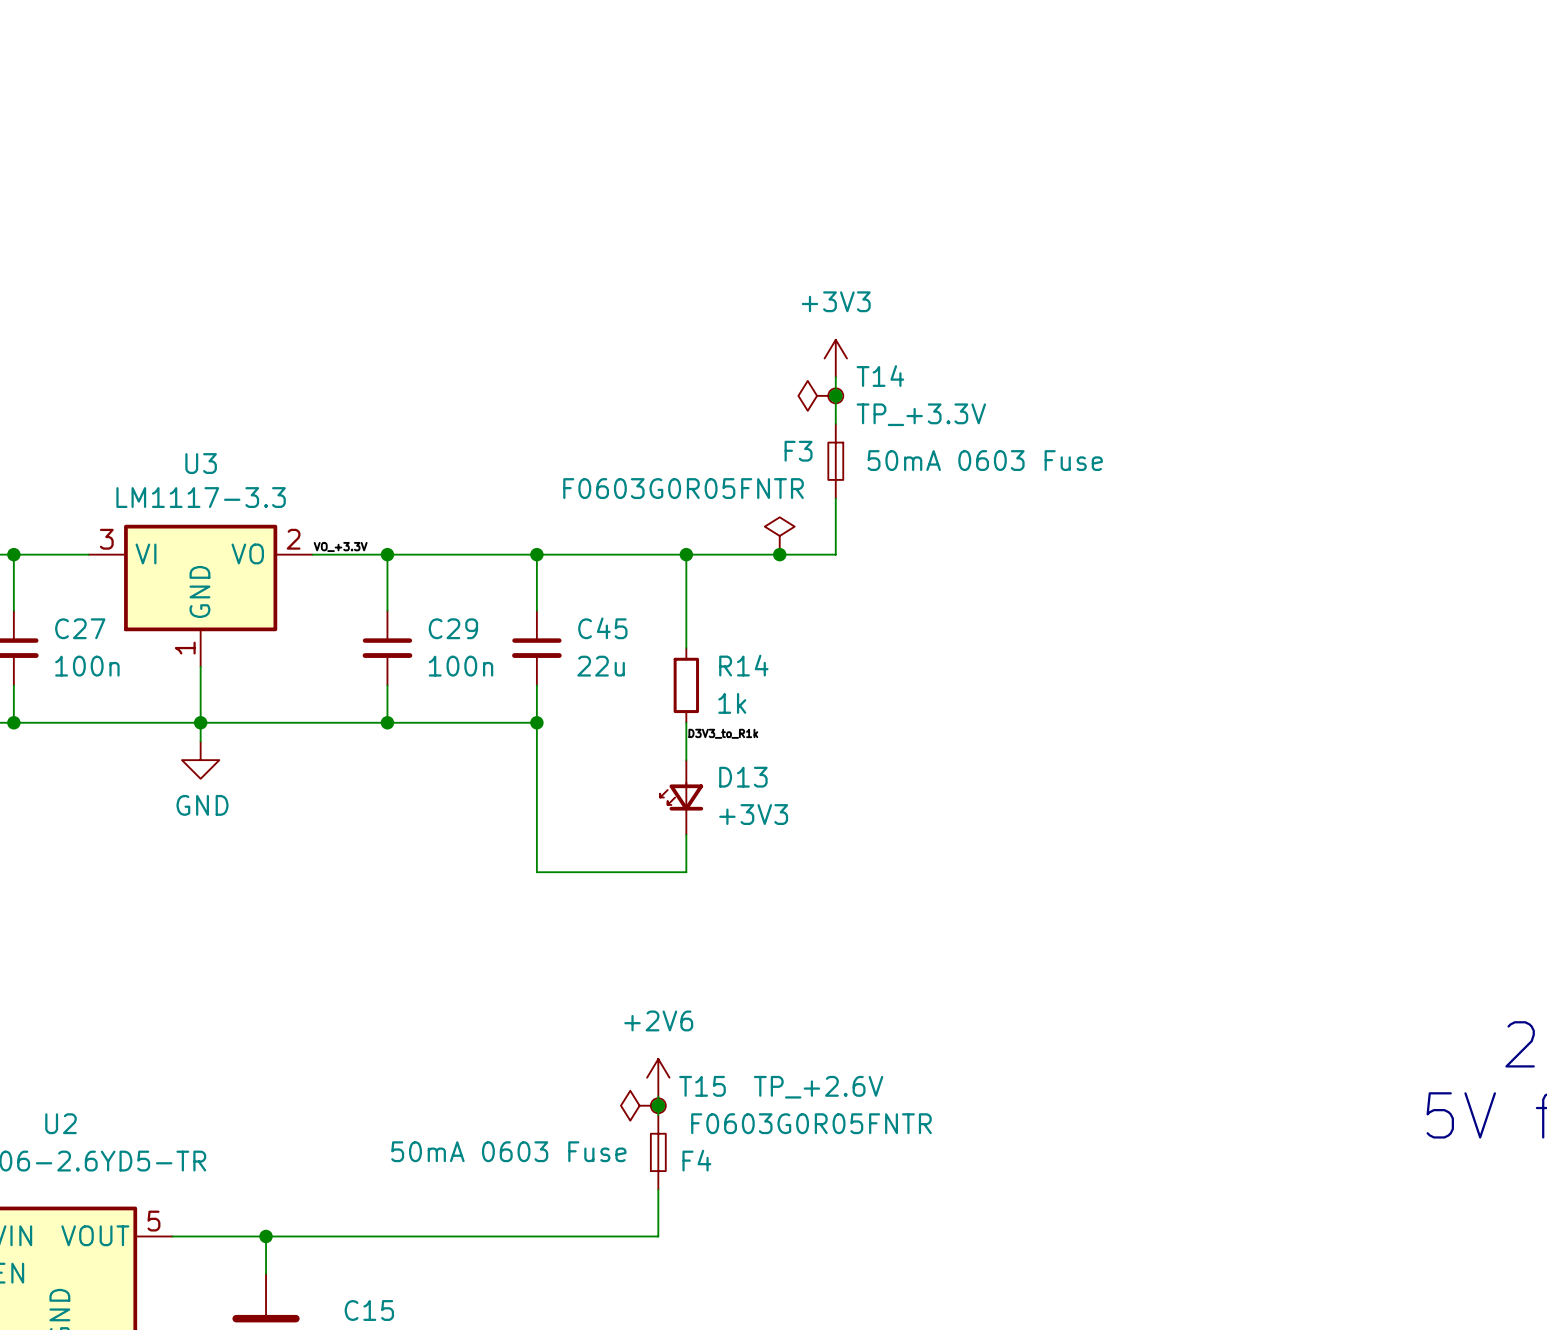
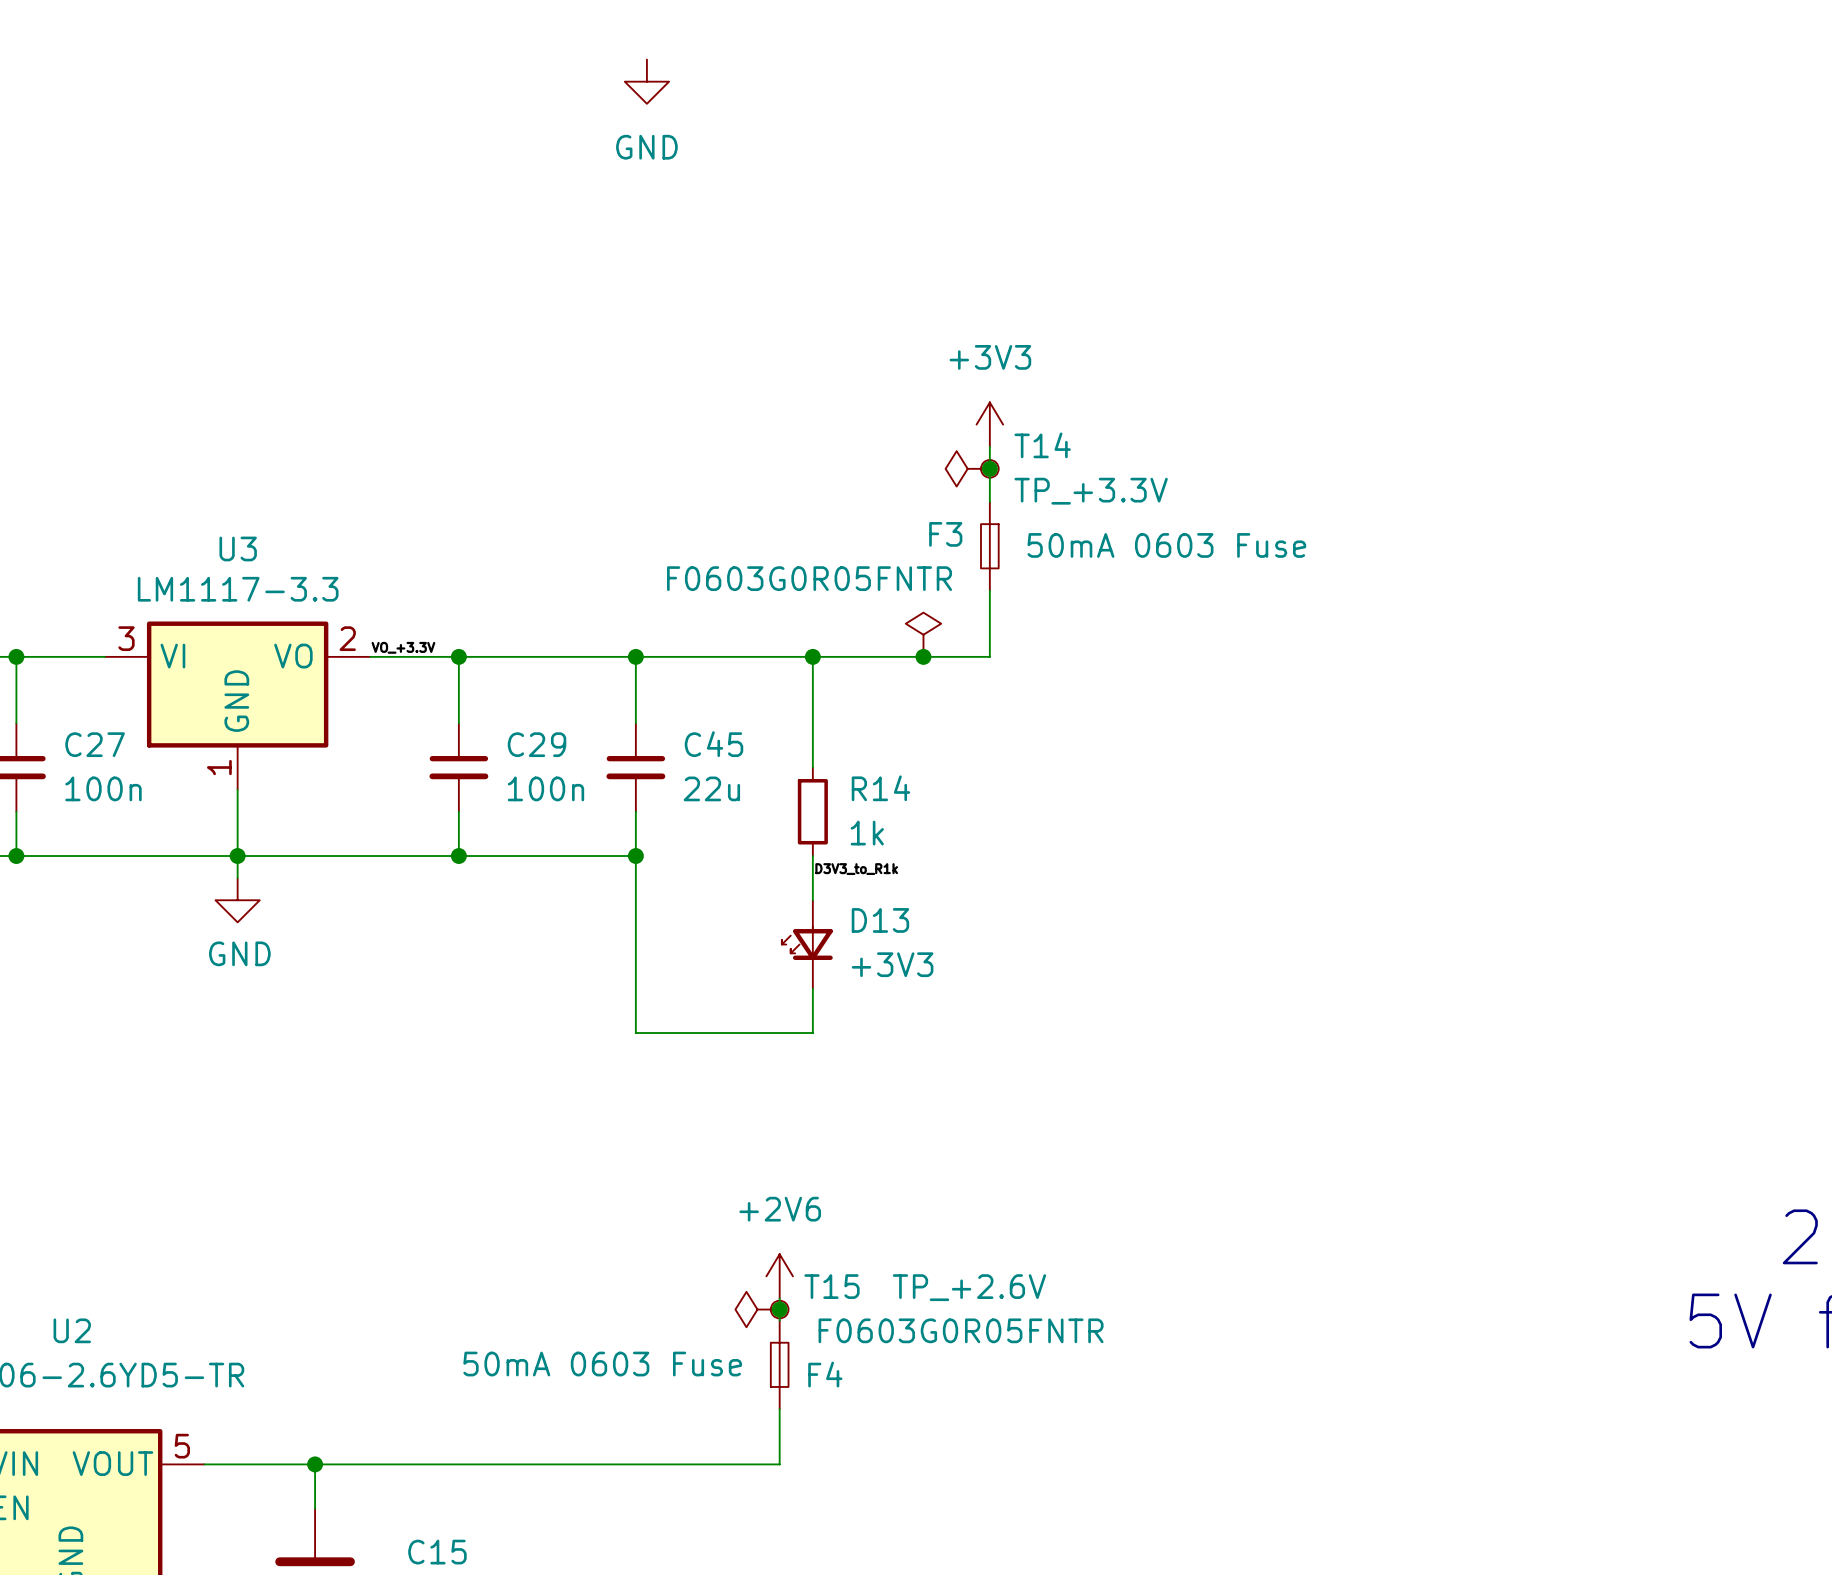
power symbol: none -> GND (646, 81)

